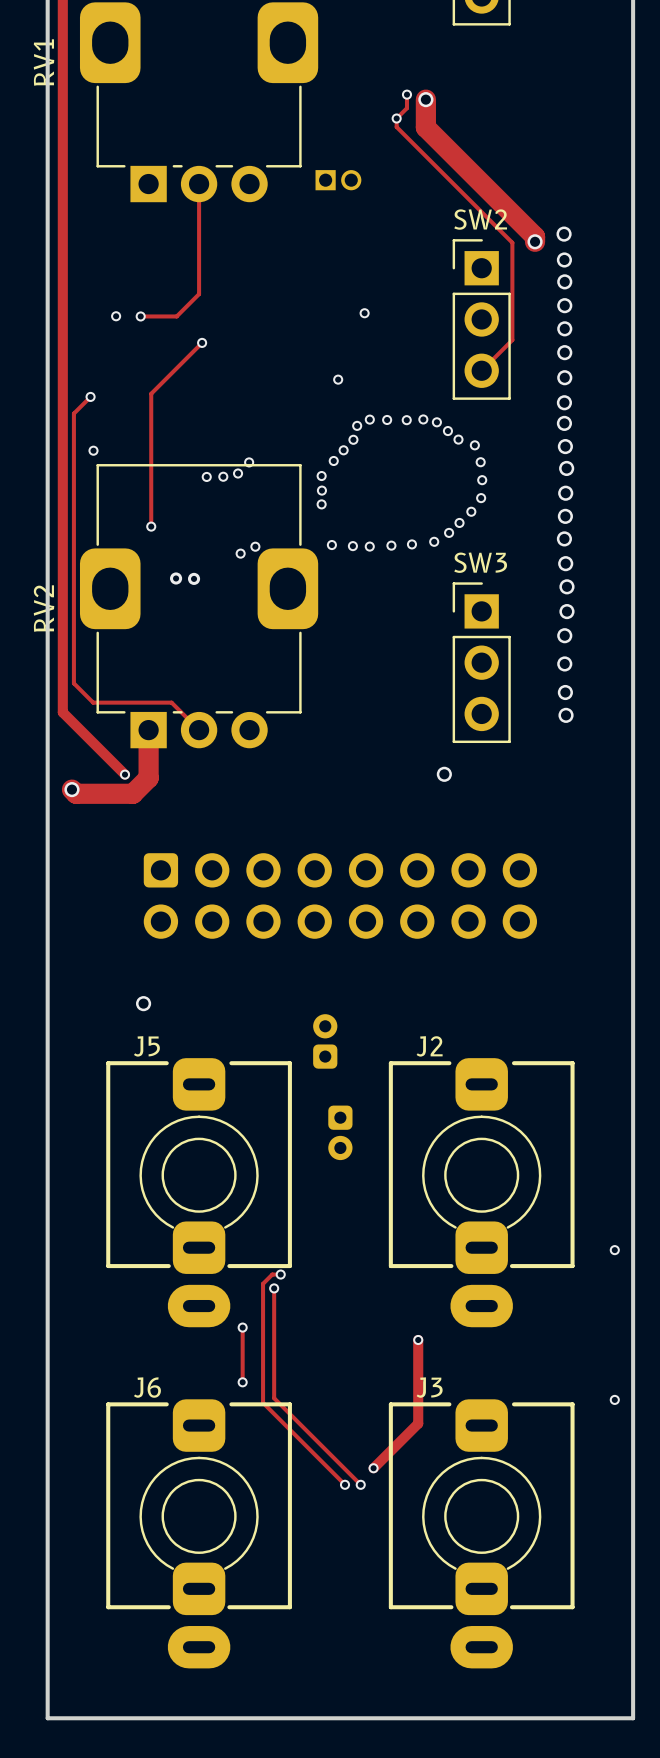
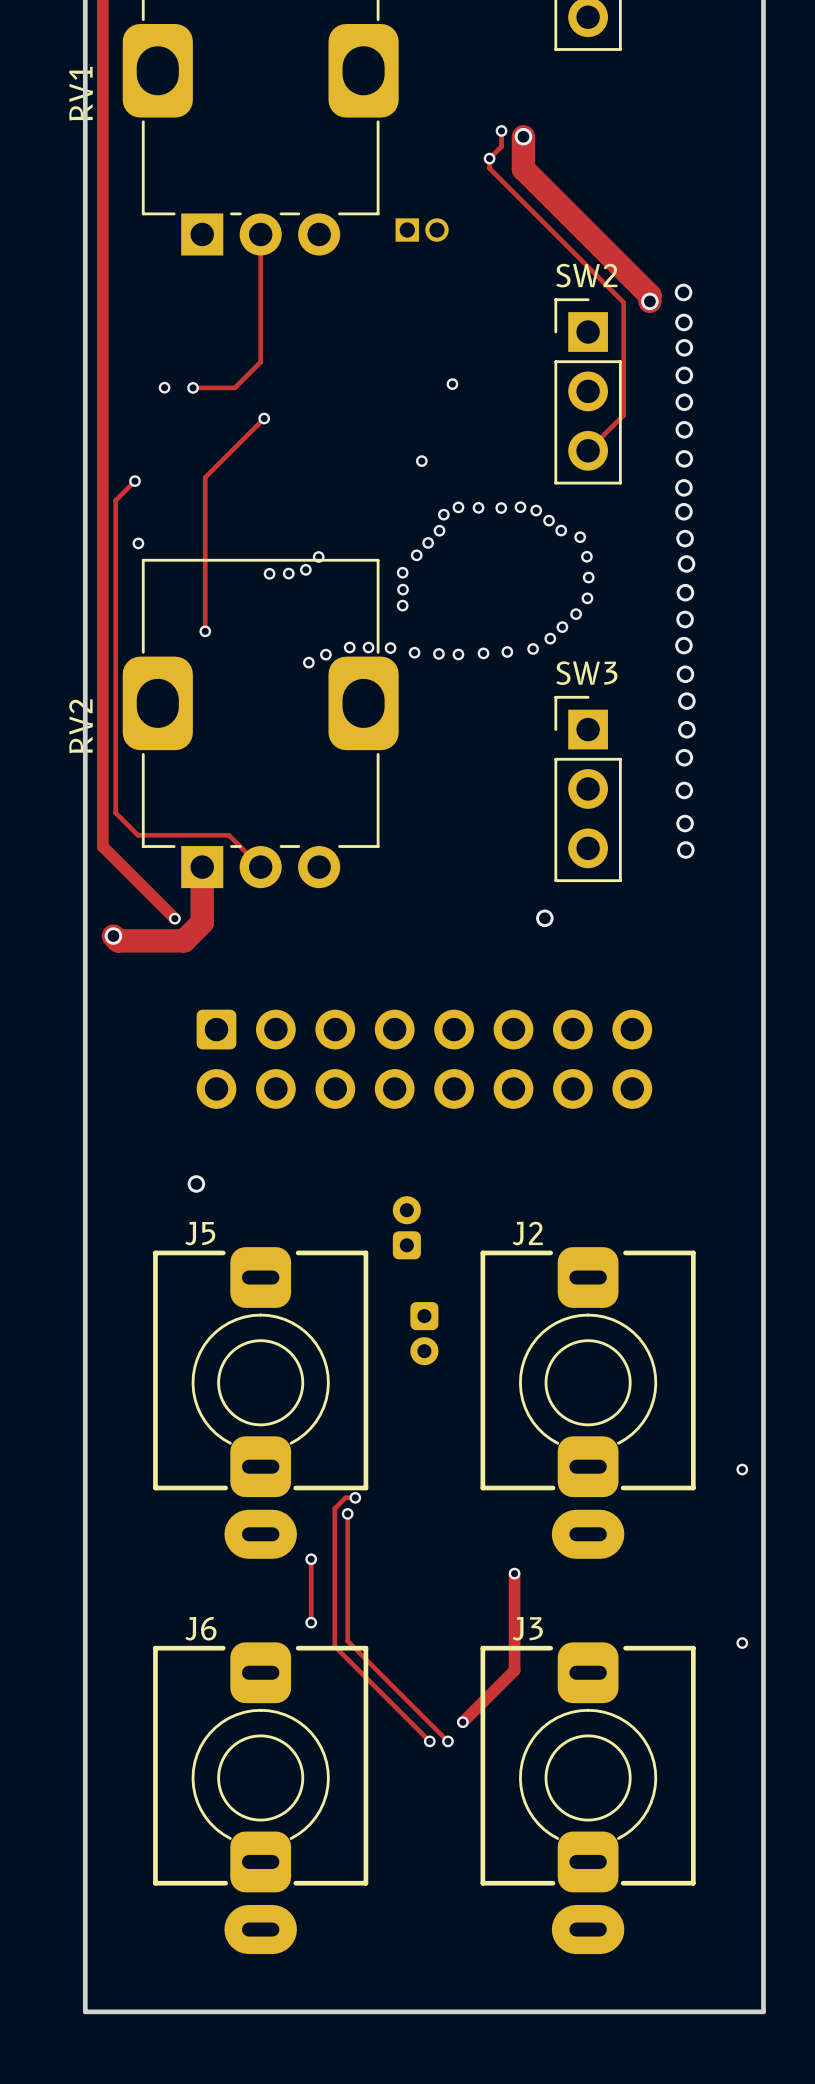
via: none -> (349, 647)
via: none -> (368, 647)
via: none -> (390, 648)
via: (176, 578) -> none
via: (194, 578) -> none

